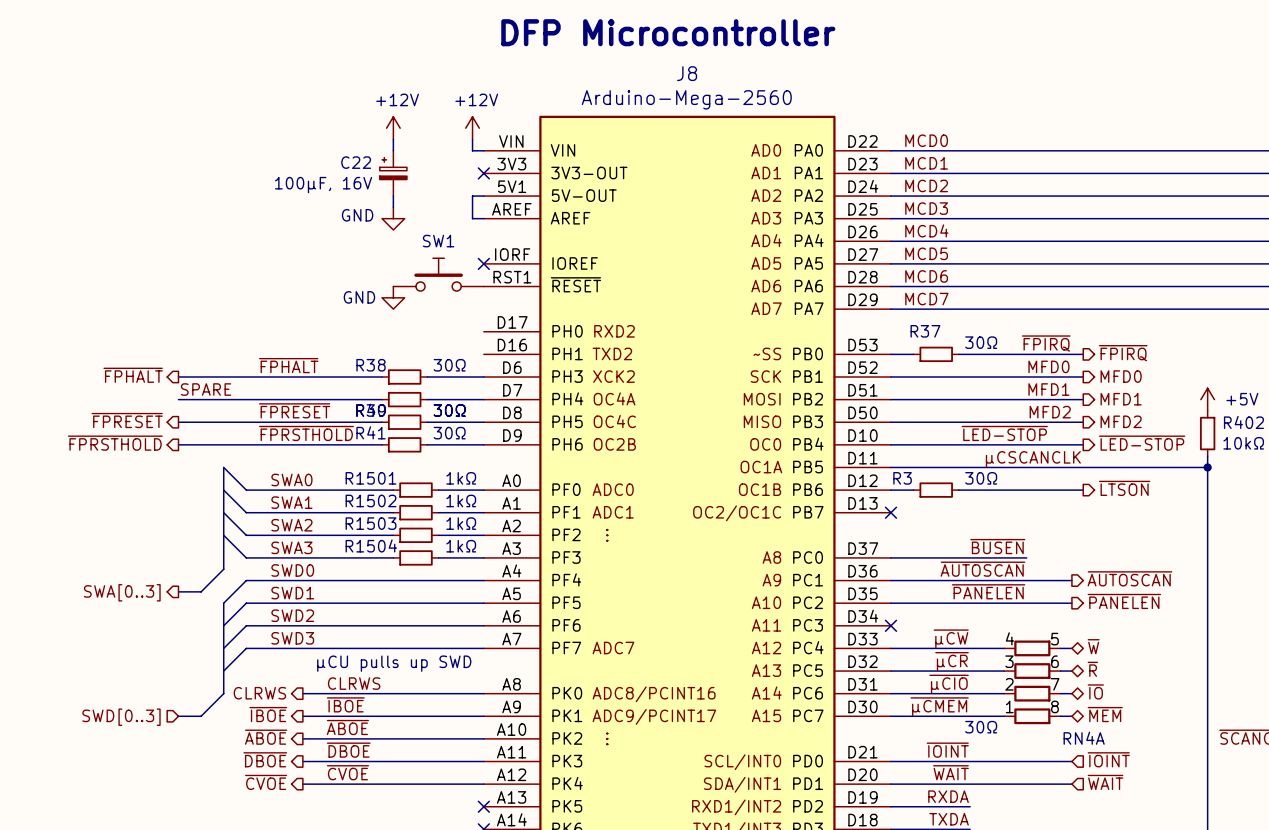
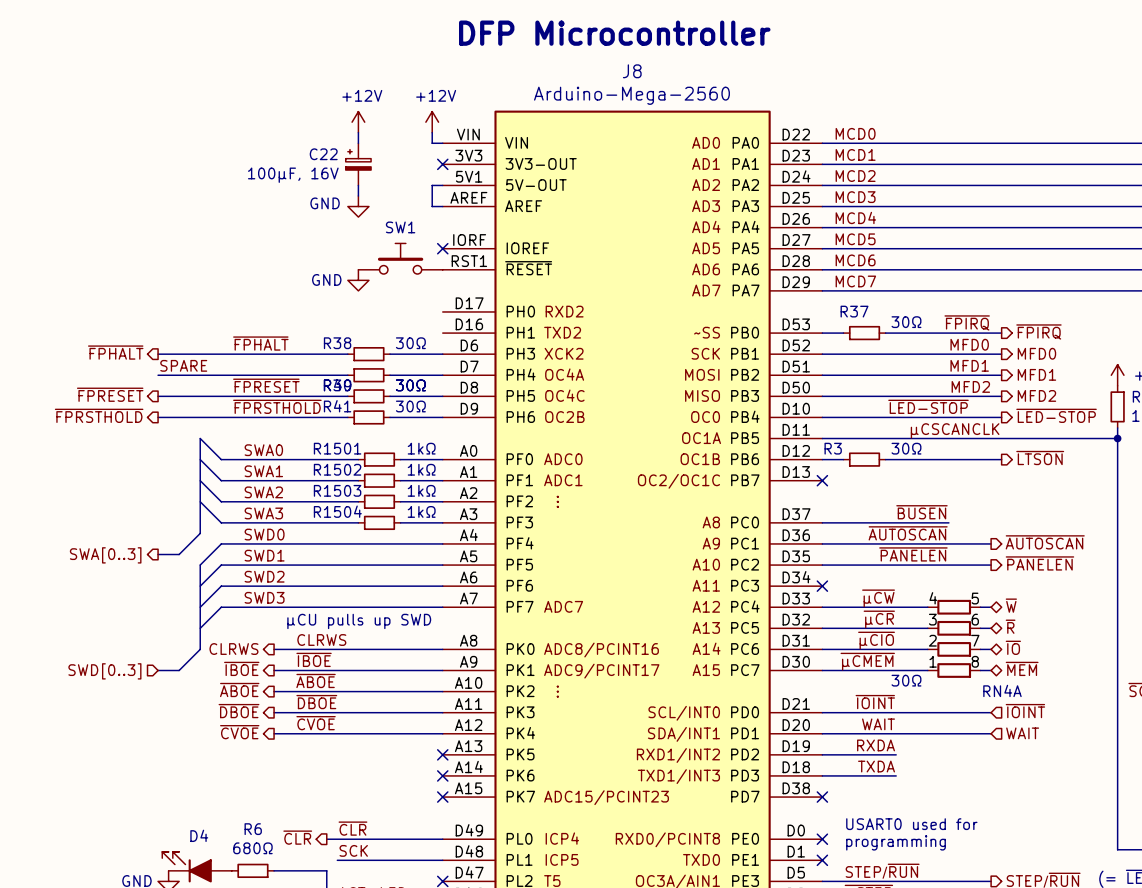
label: ~{WAIT} (950, 772) -> WAIT (878, 724)
hierarchical label: ~{WAIT} (1105, 782) -> WAIT (1022, 733)

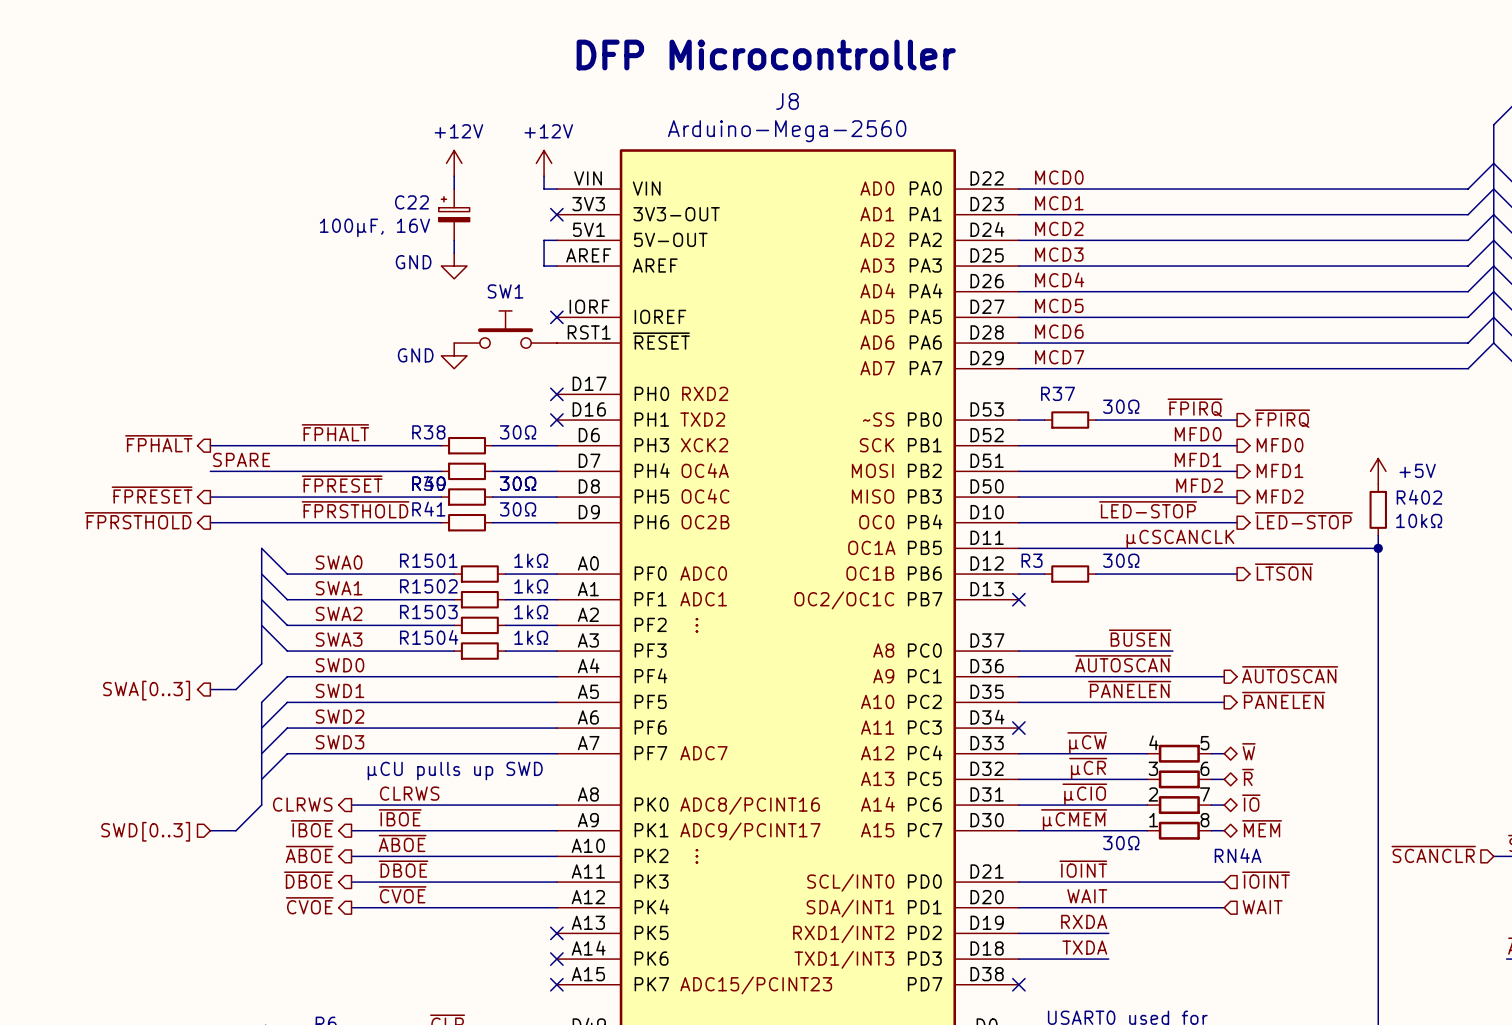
no-connect mark: none -> (556, 394)
no-connect mark: none -> (556, 420)

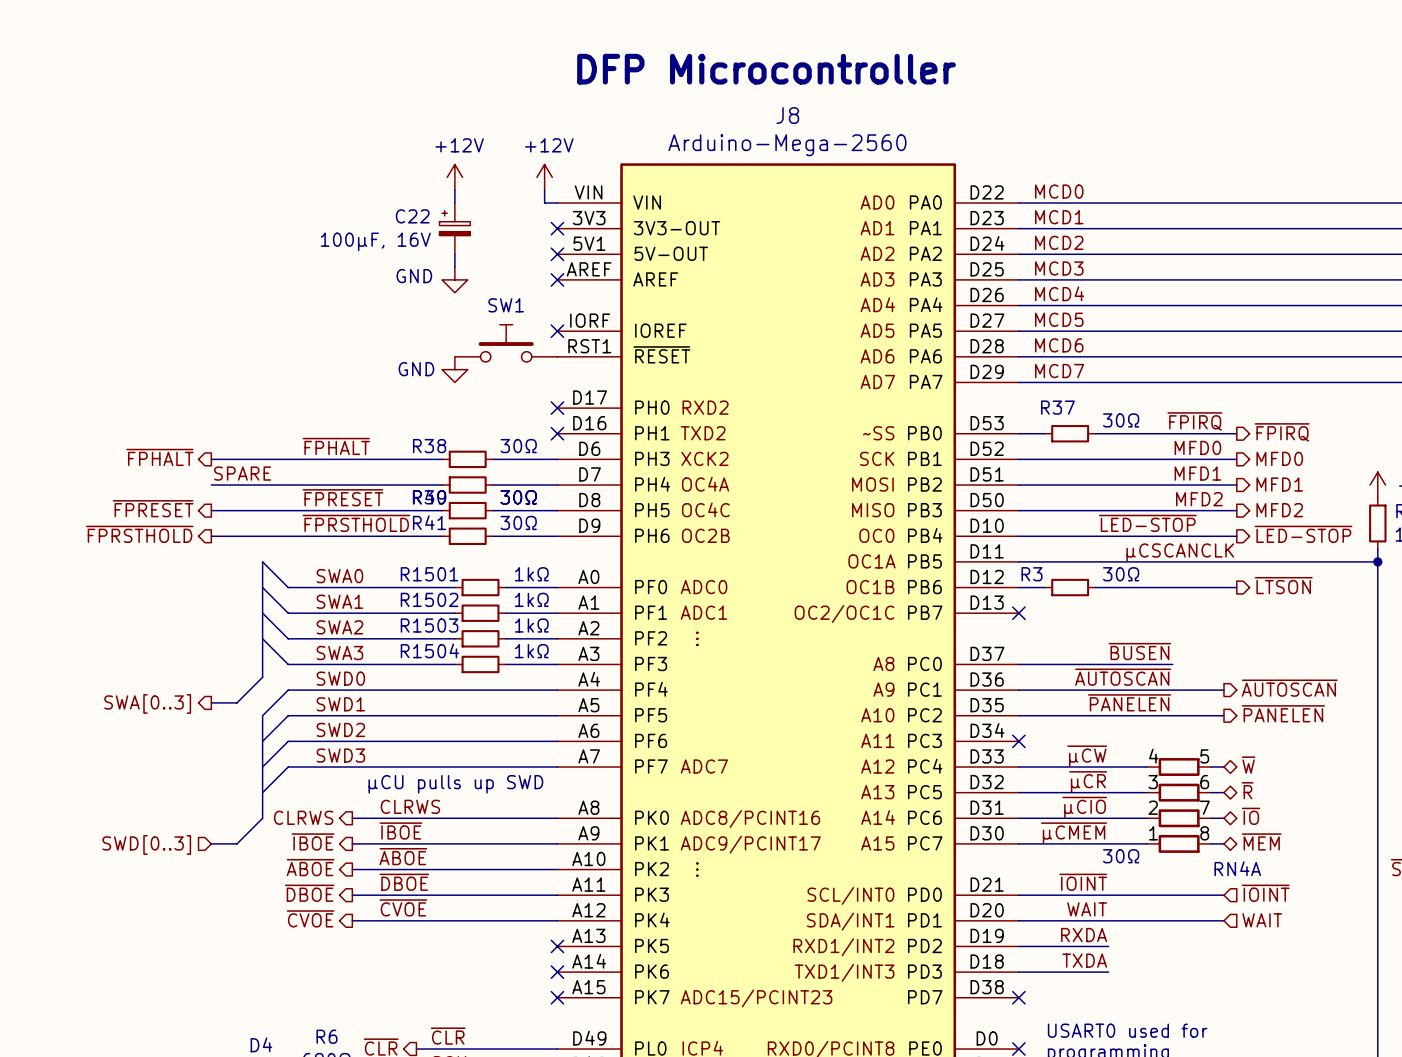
wire: (556, 240) (544, 240) (544, 266) (556, 266) -> none
no-connect mark: none -> (557, 254)
no-connect mark: none -> (557, 279)

